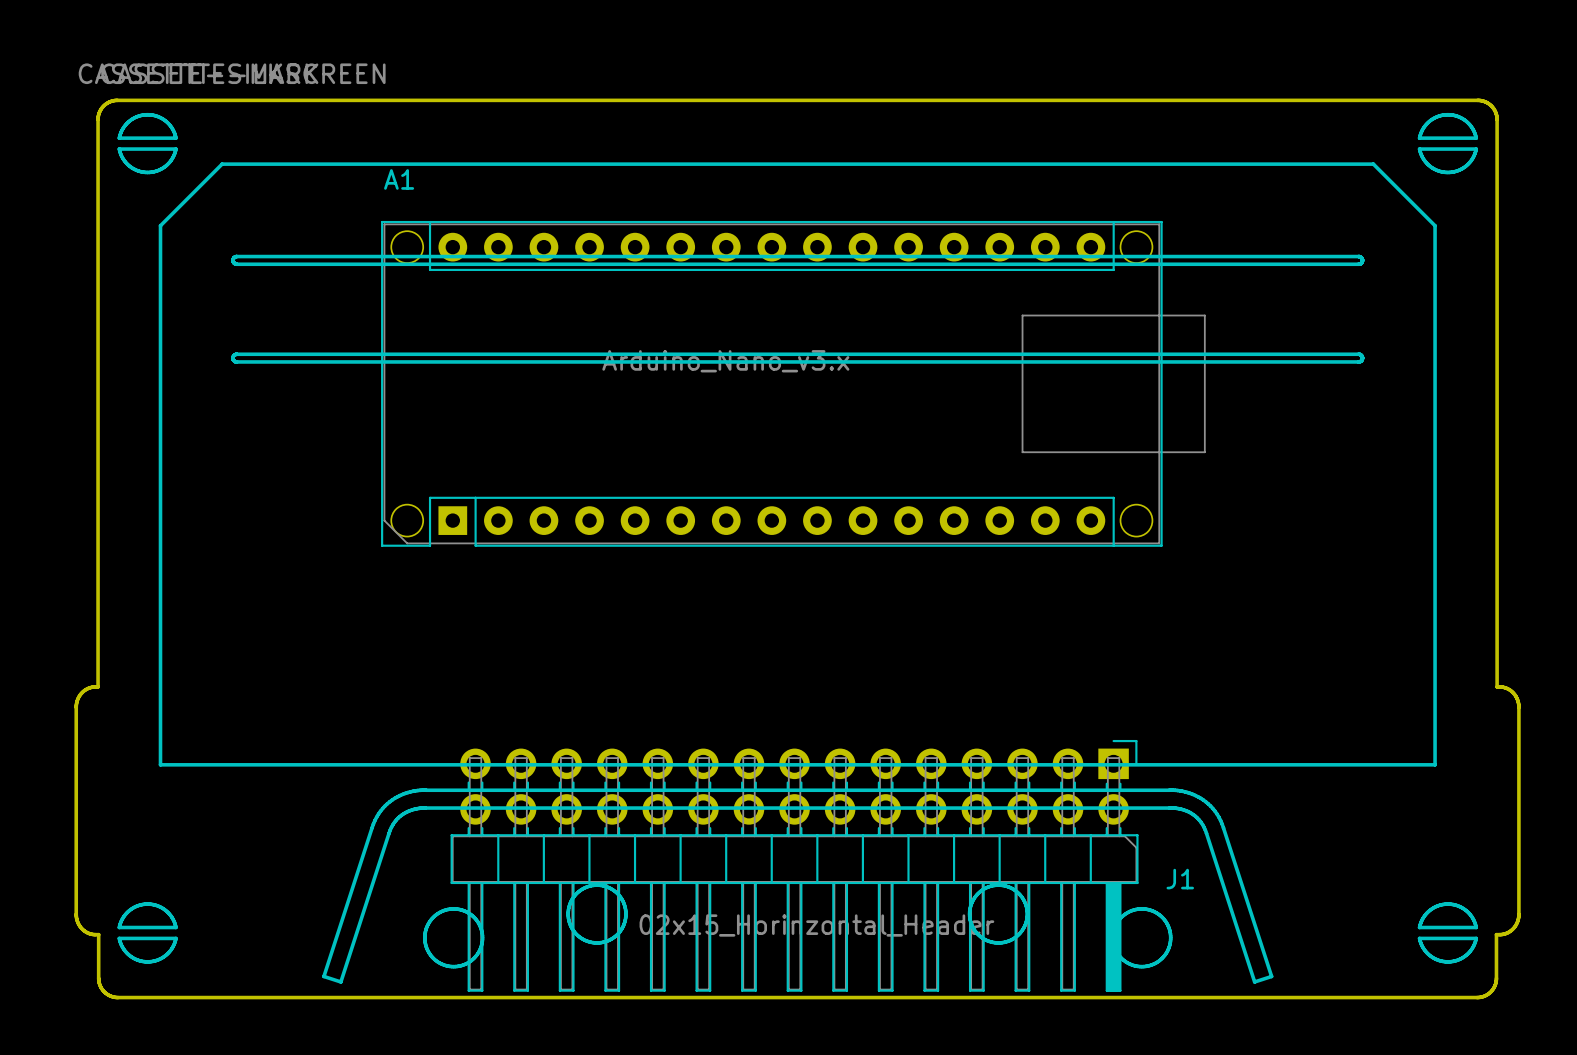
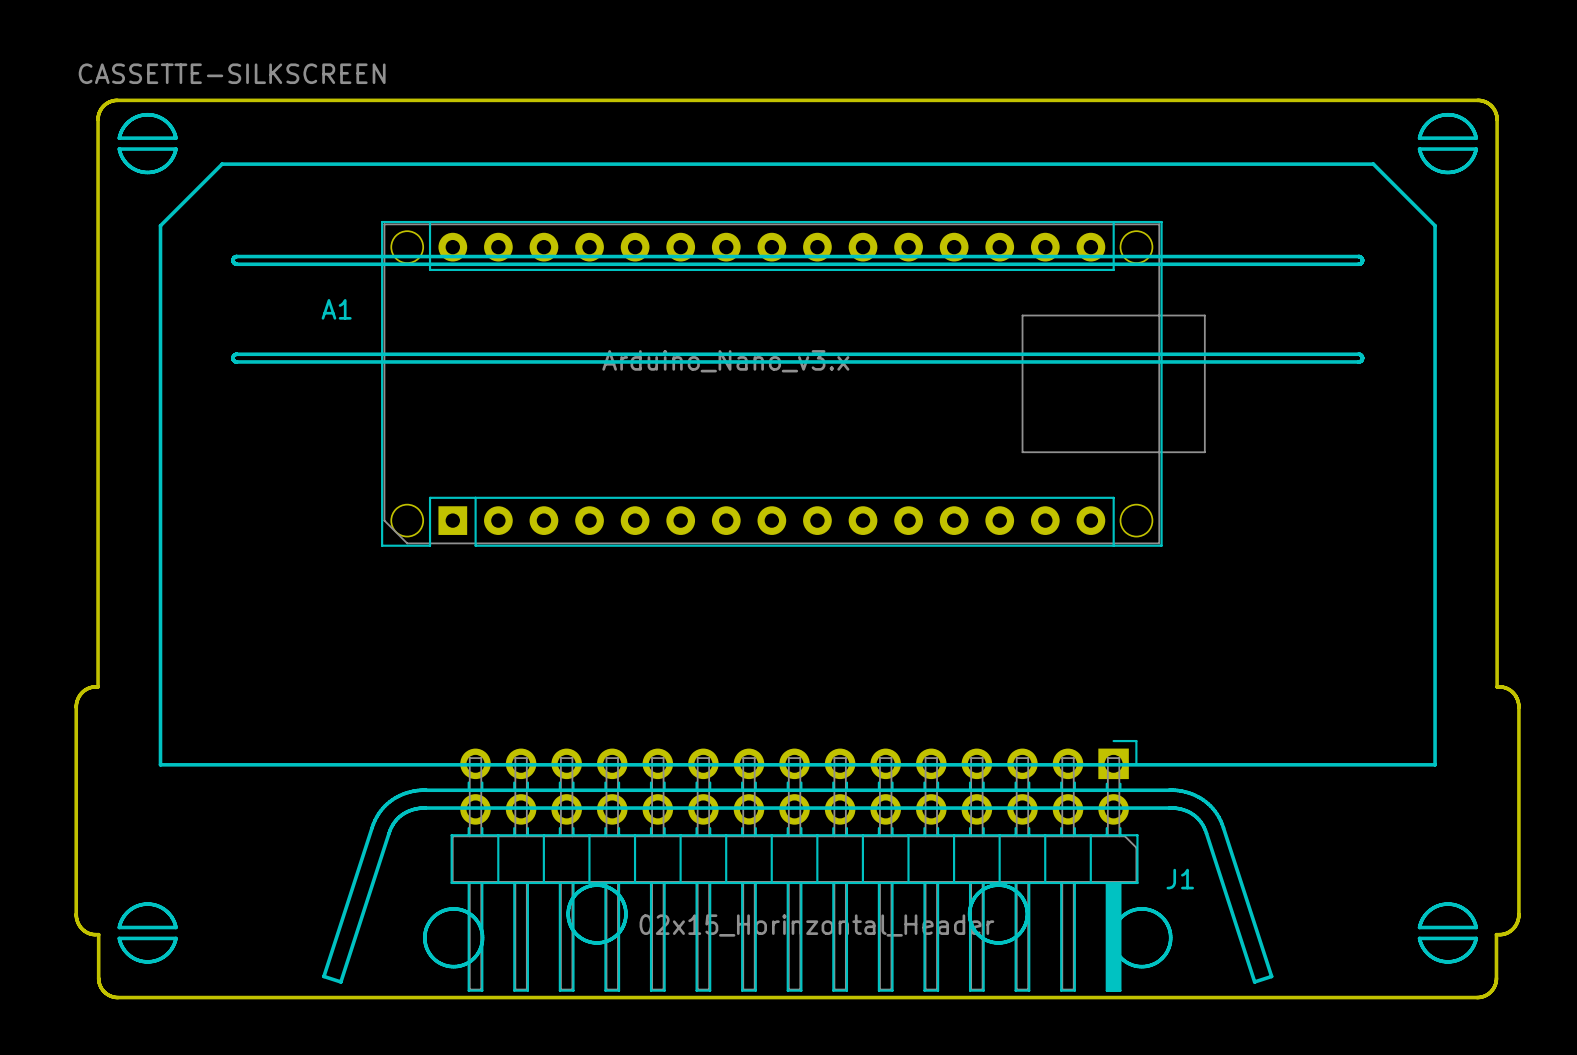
drawing: [101, 63, 319, 85] -> none
A1 name position: A1 (399, 179) -> A1 (336, 309)

